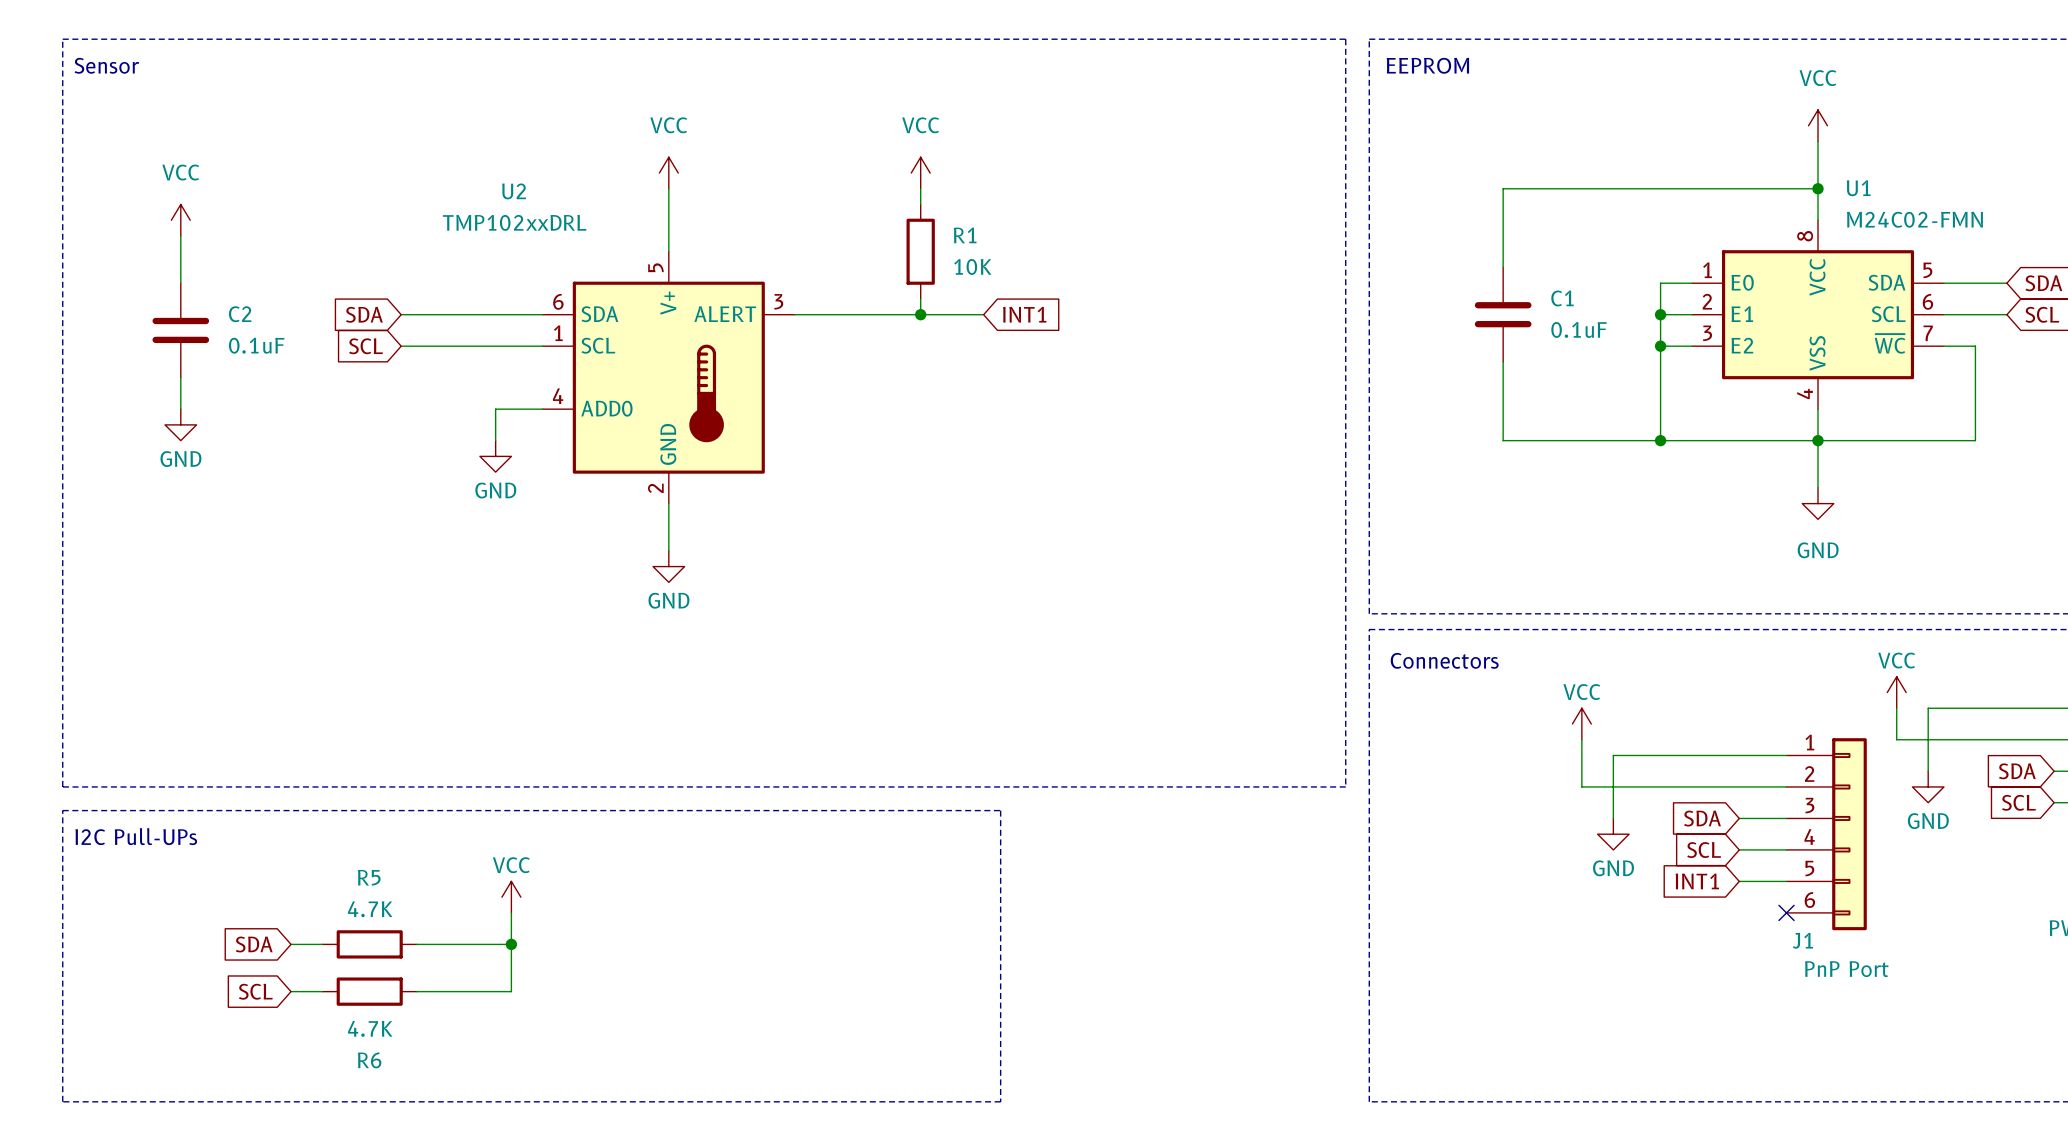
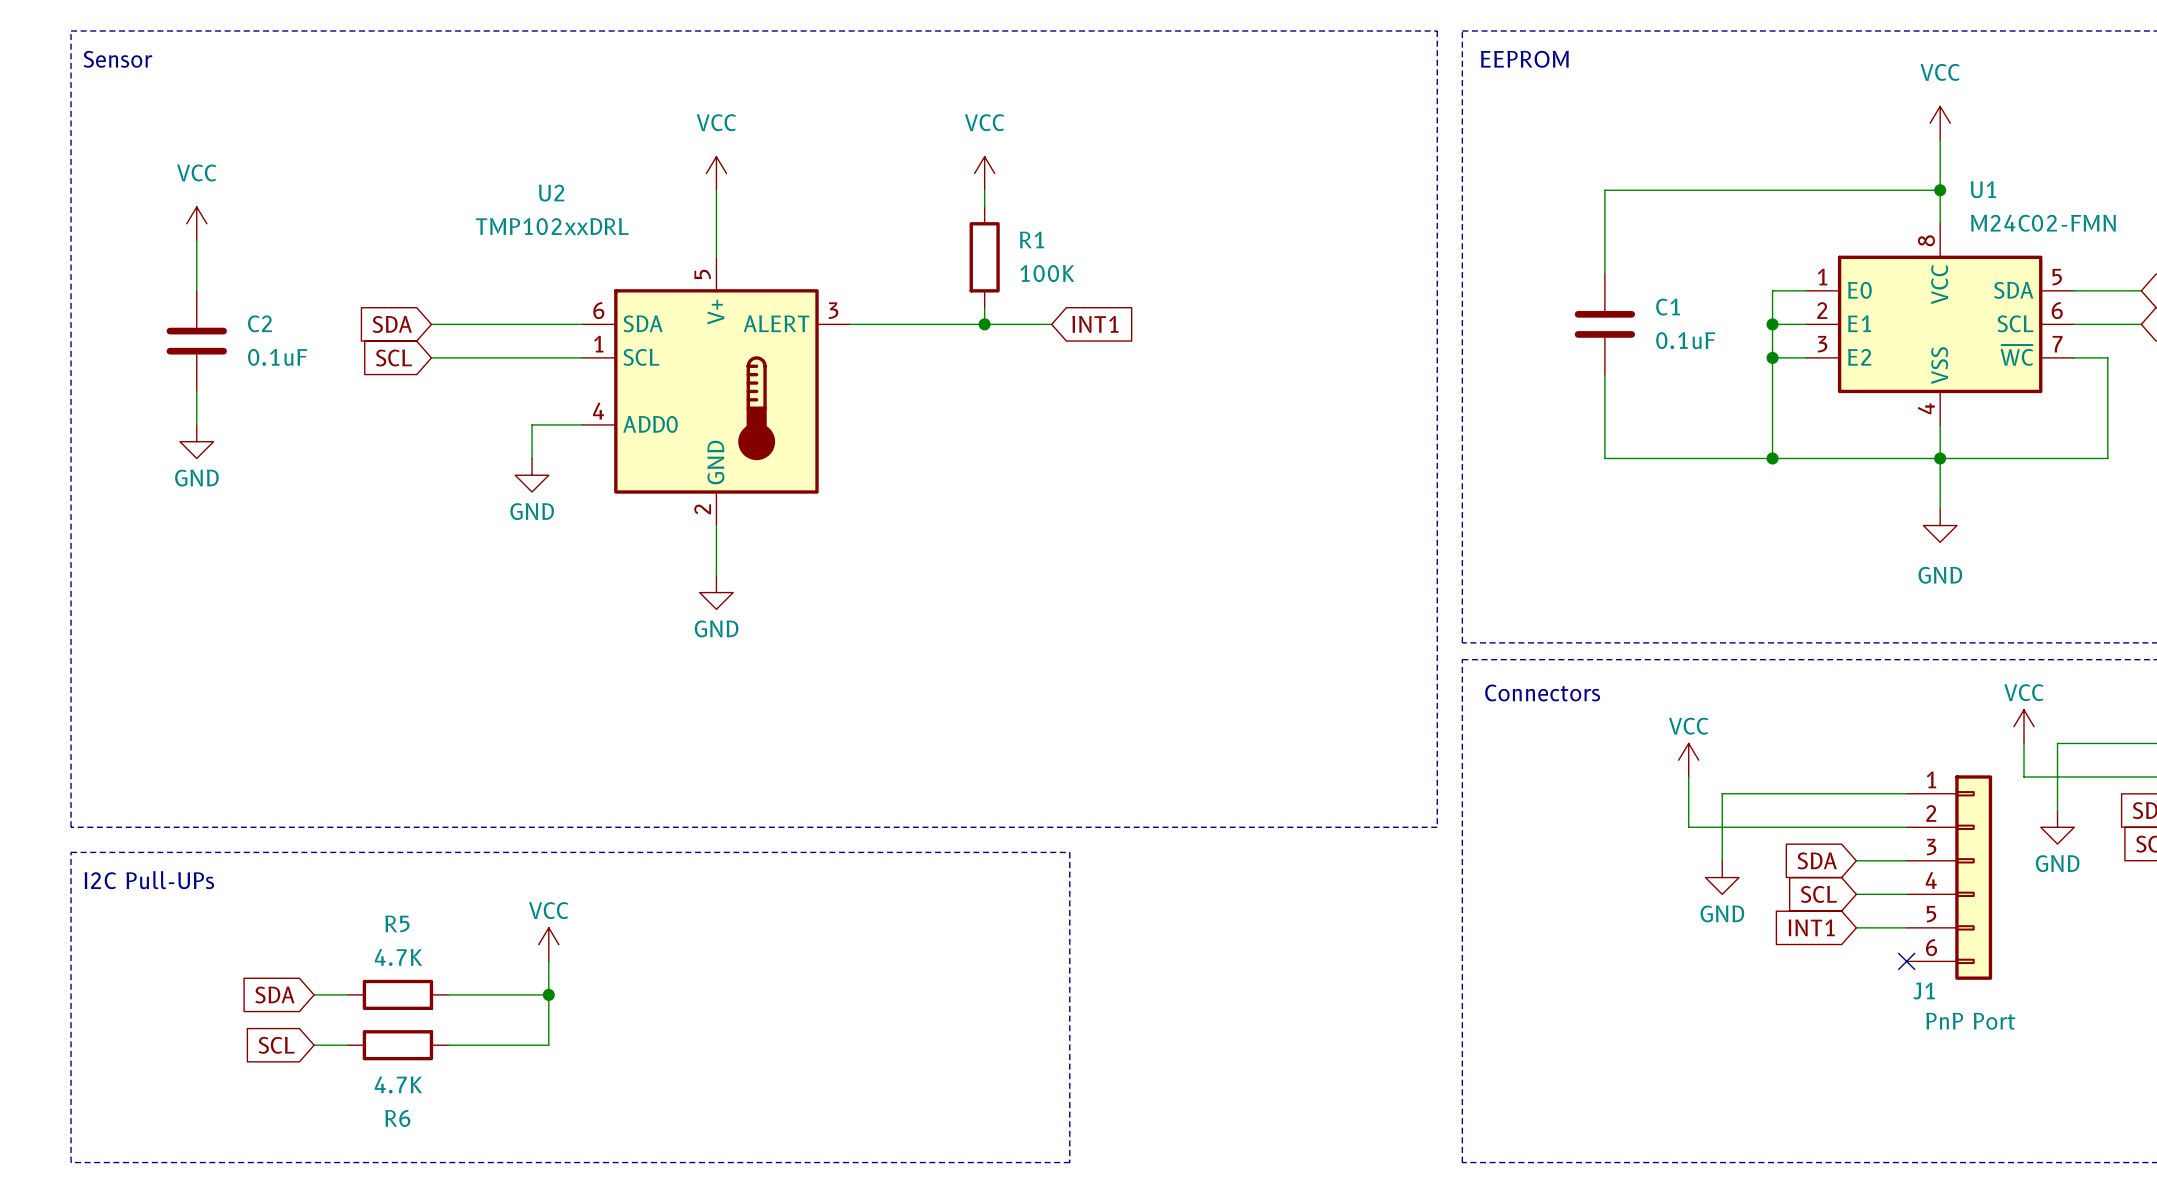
R1 value: 10K (972, 266) -> 100K (1047, 273)

